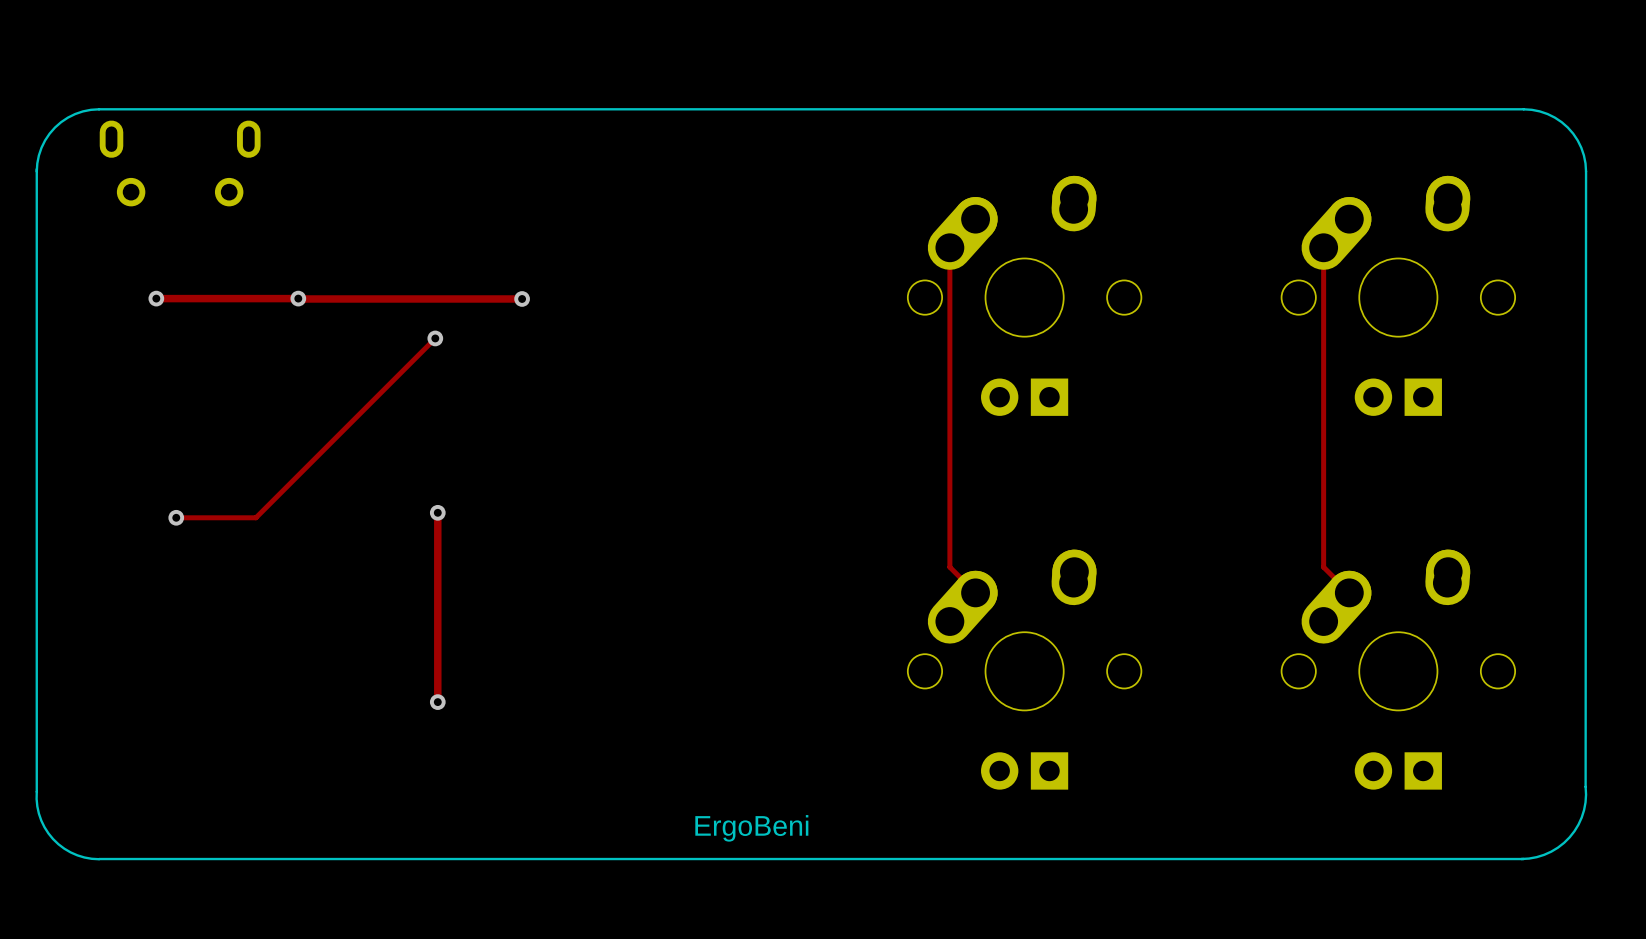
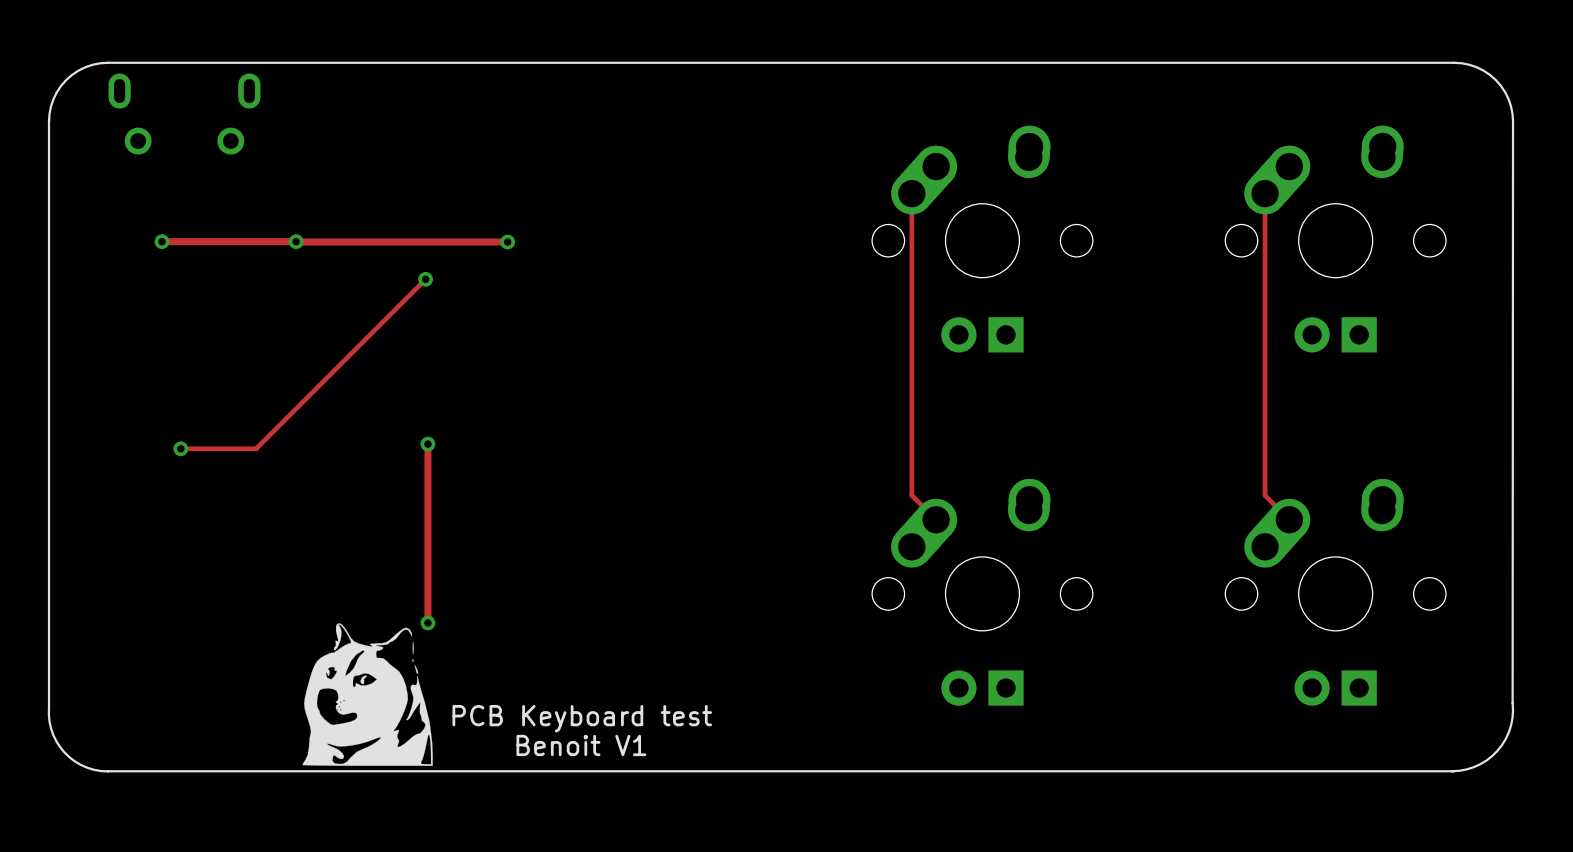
drawing: none -> [302, 623, 433, 766]
text: none -> PCB Keyboard test (582, 718)
text: ErgoBeni (751, 828) -> none
text: none -> Benoit V1 (581, 745)

